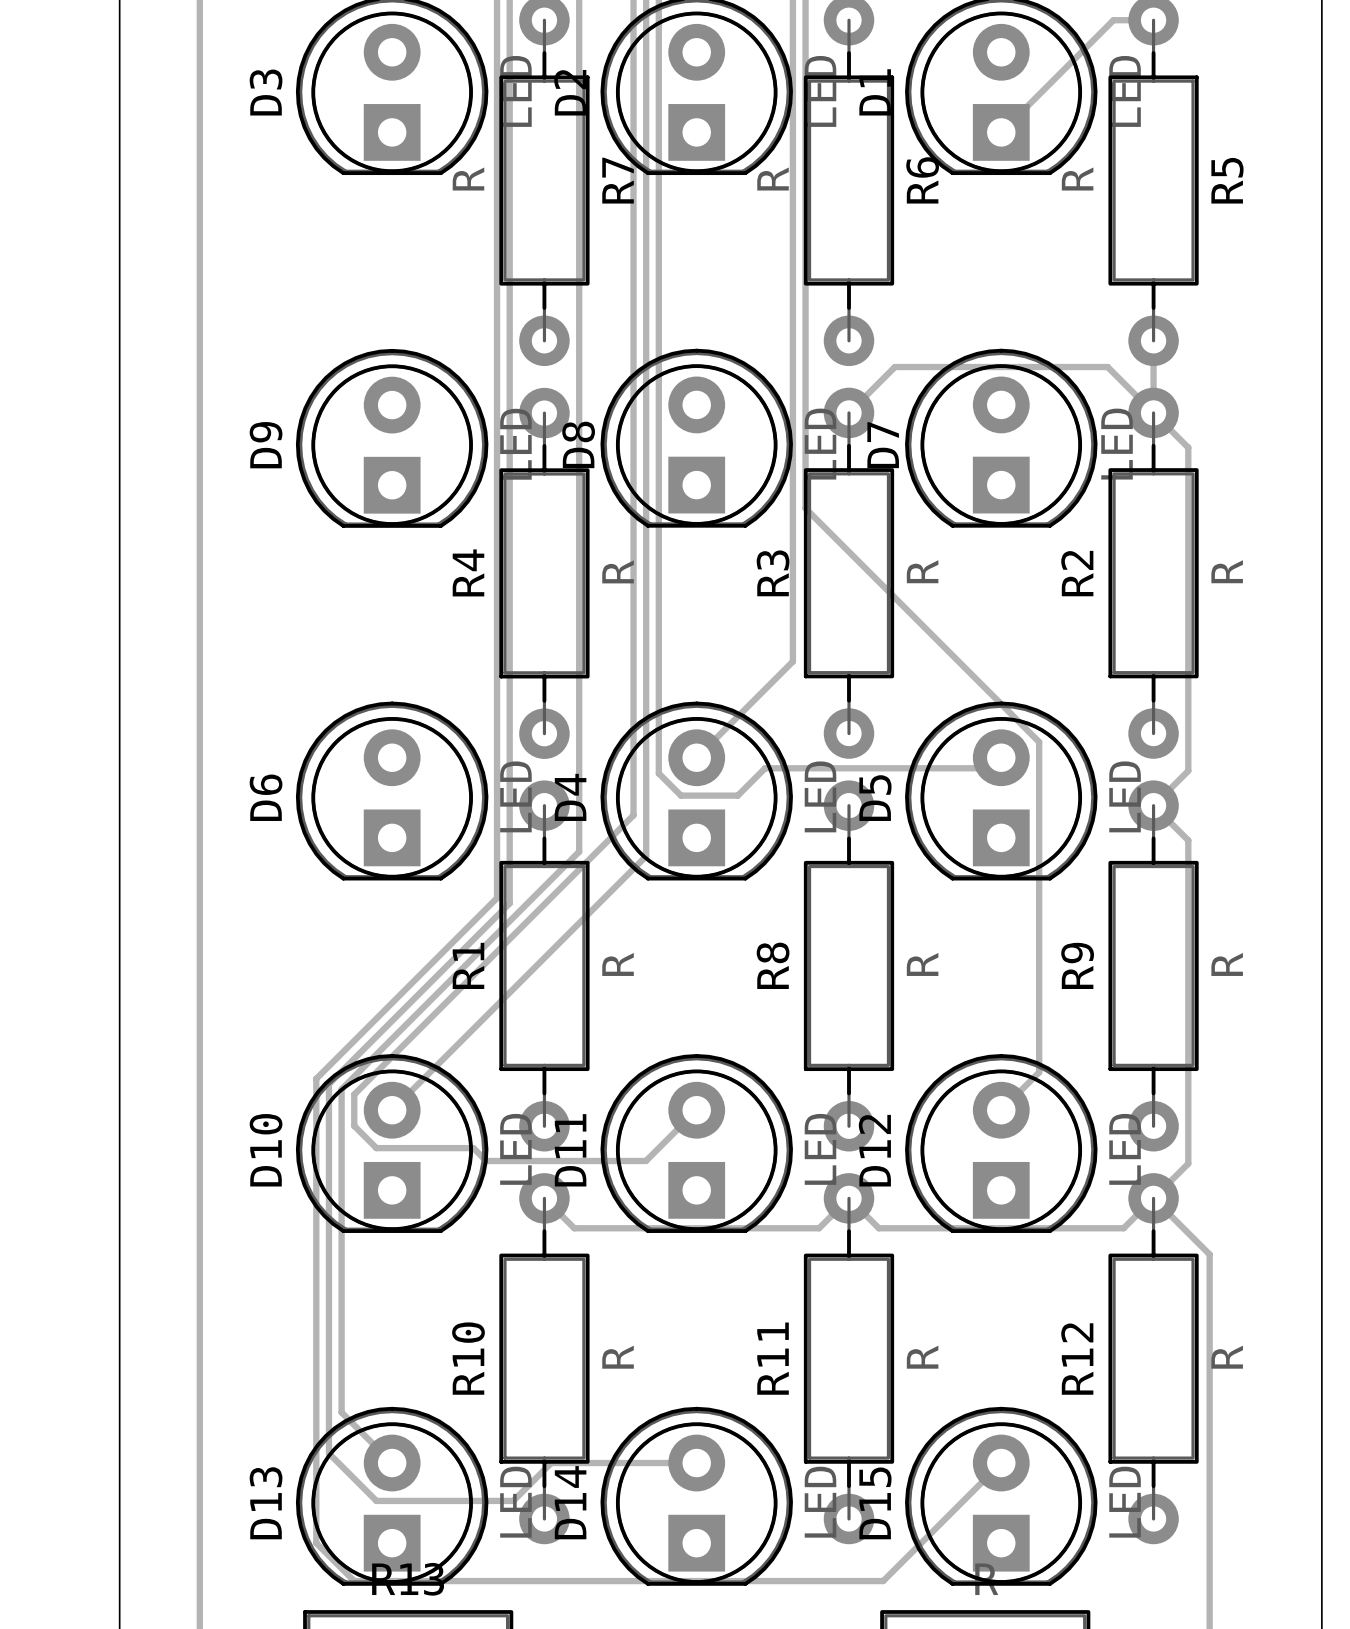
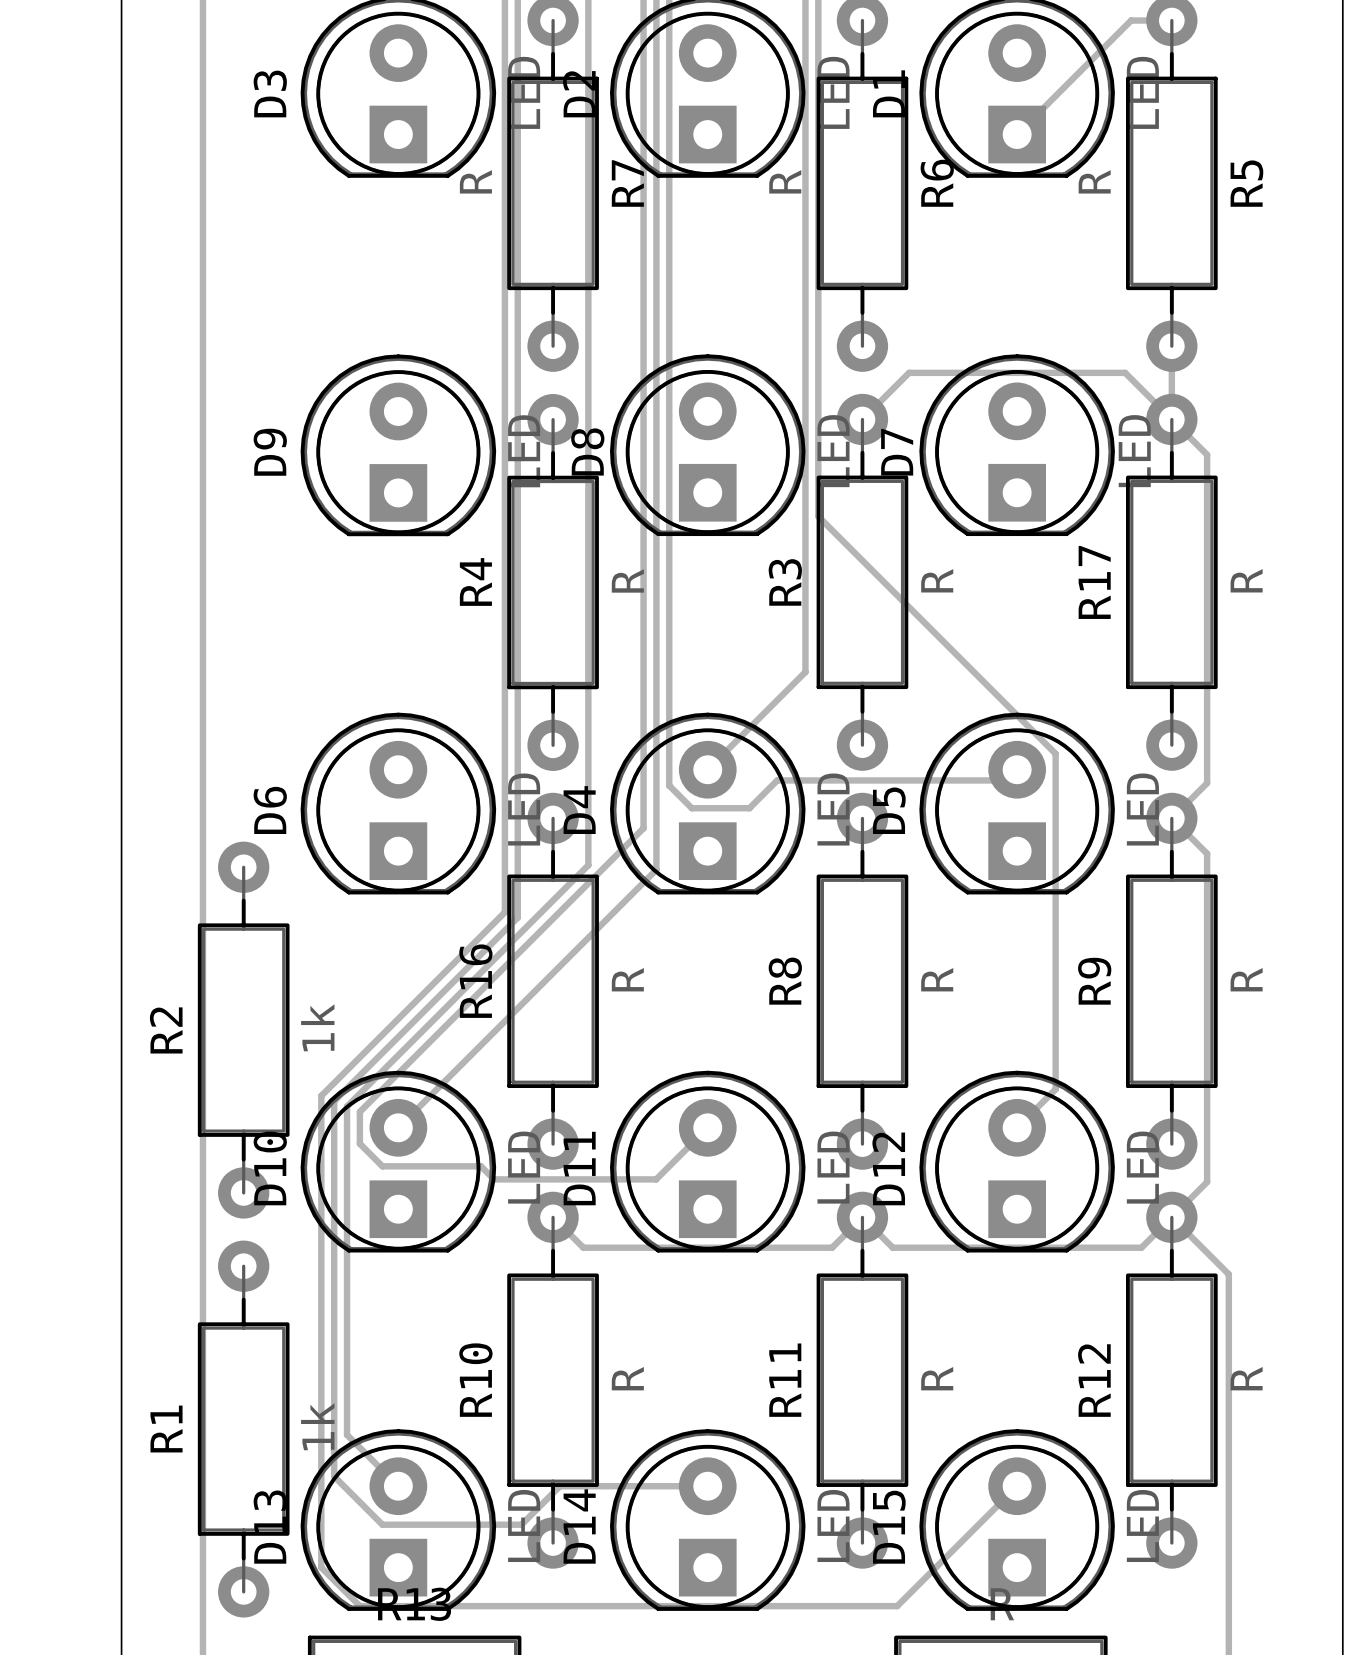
R2 name: R2 (1077, 573) -> R17 (1094, 582)
R1 name: R1 (468, 965) -> R16 (475, 981)
R2: none -> 1k (243, 1030)
R1: none -> 1k (243, 1429)

